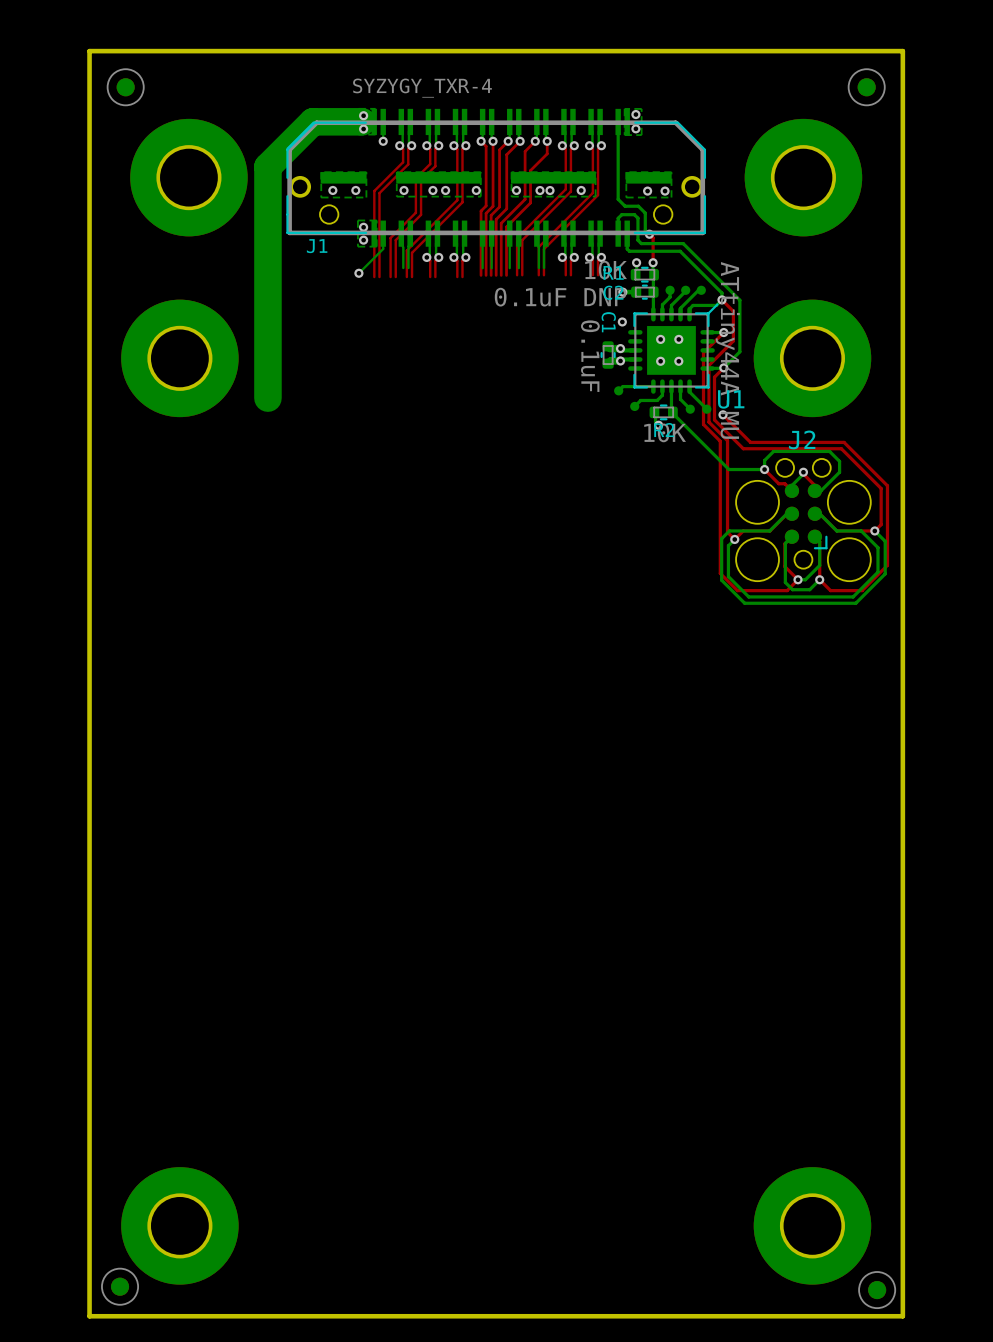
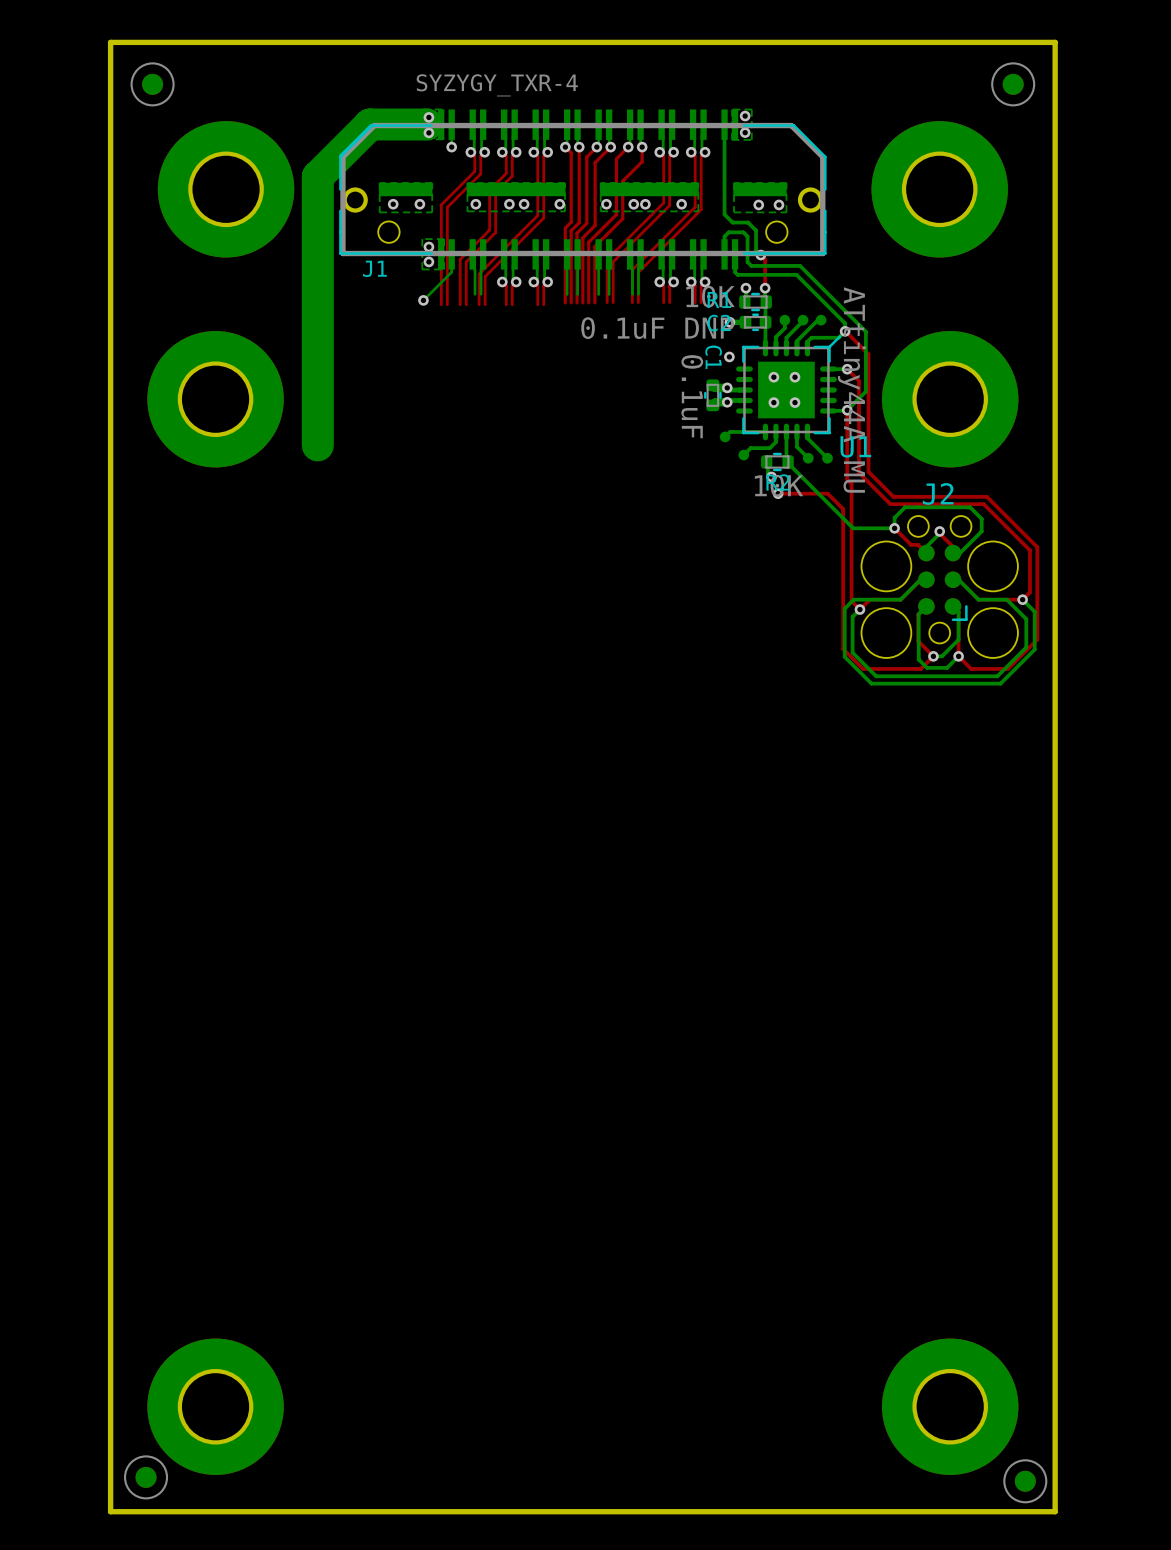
top track: (721, 299) (733, 311) (733, 340) (709, 365) (709, 422) (727, 440) -> none
top track: (723, 332) (703, 352) (703, 424) (720, 441) (720, 452) -> (847, 369) (858, 380) (858, 472) (890, 504)
top track: (723, 367) (714, 377) (714, 419) (743, 448) (760, 448) -> (847, 410) (847, 479) (851, 483) (851, 494)
top track: (723, 414) (750, 442) (763, 442) -> (849, 334) (868, 354) (868, 471) (893, 496)
via position: (723, 414) -> (778, 493)
top track: none -> (778, 493) (827, 493) (843, 509)

